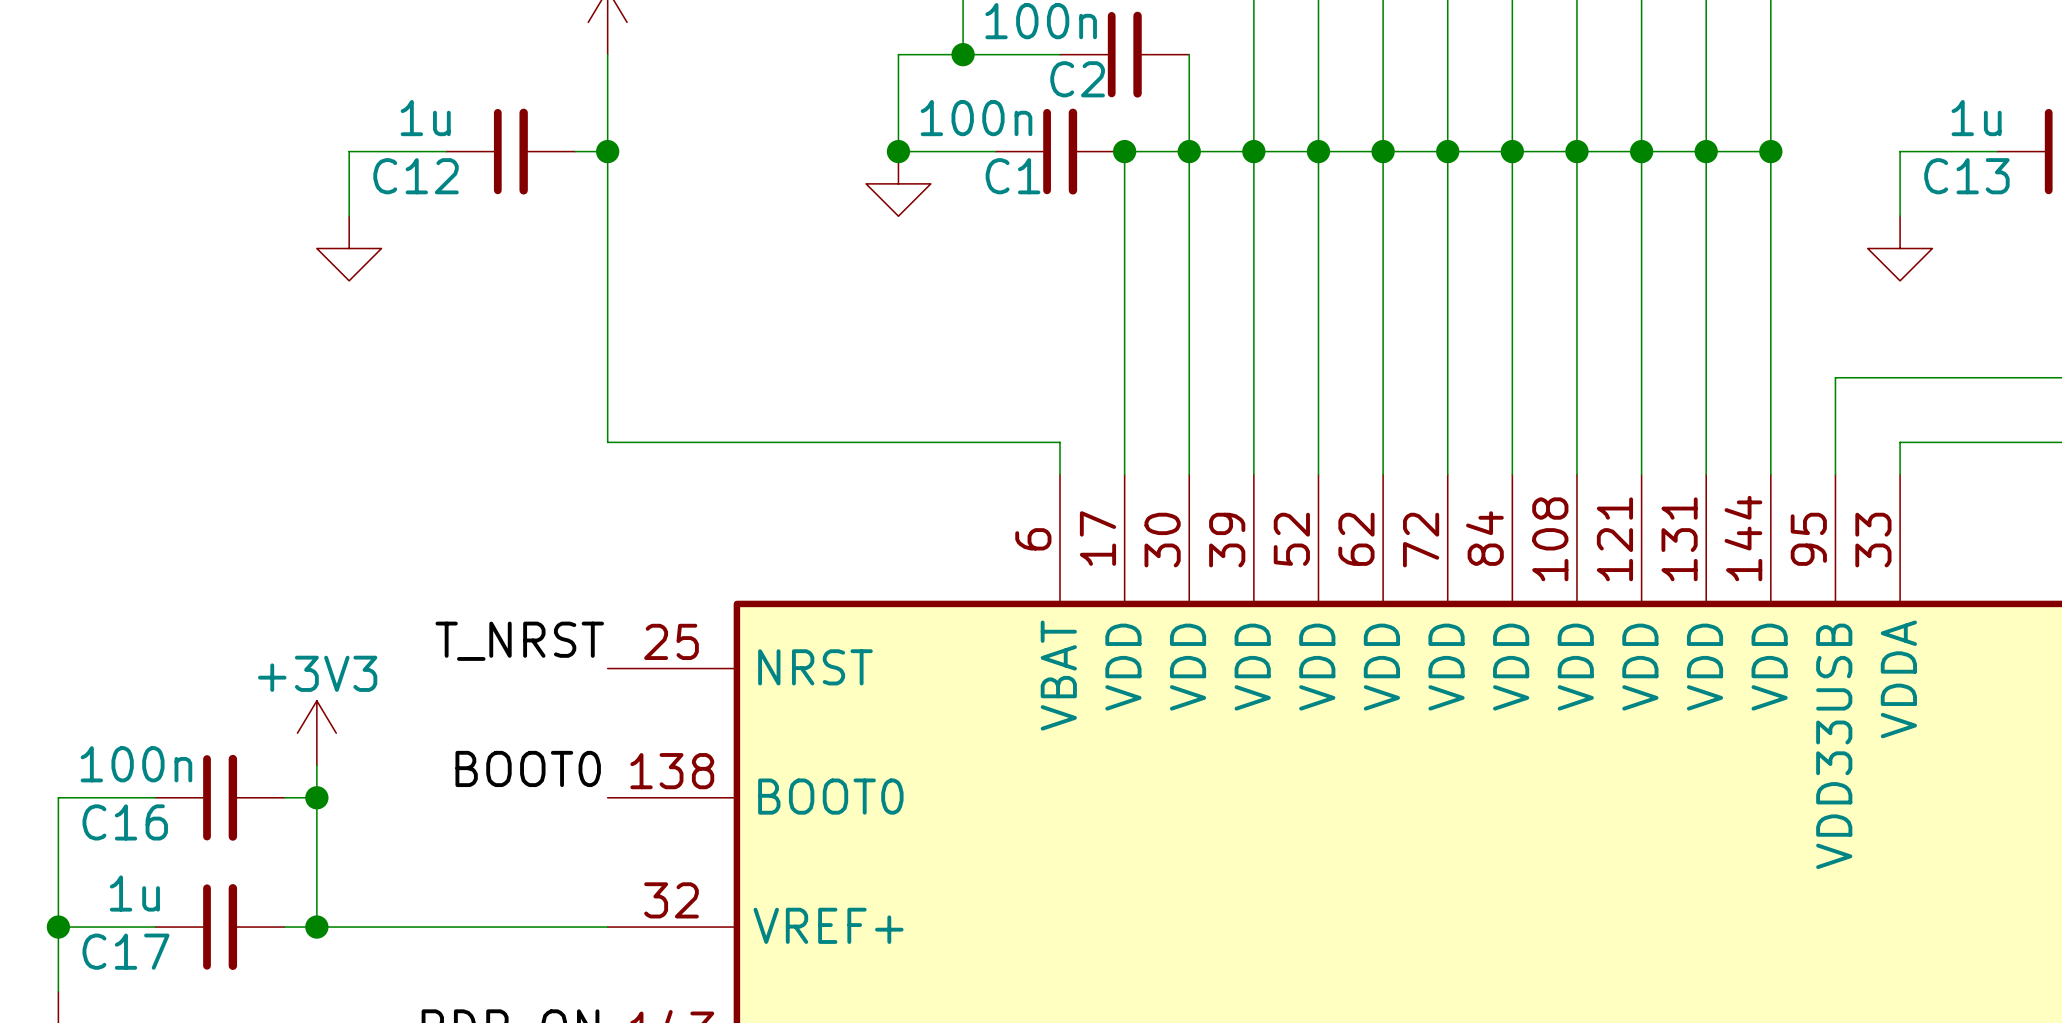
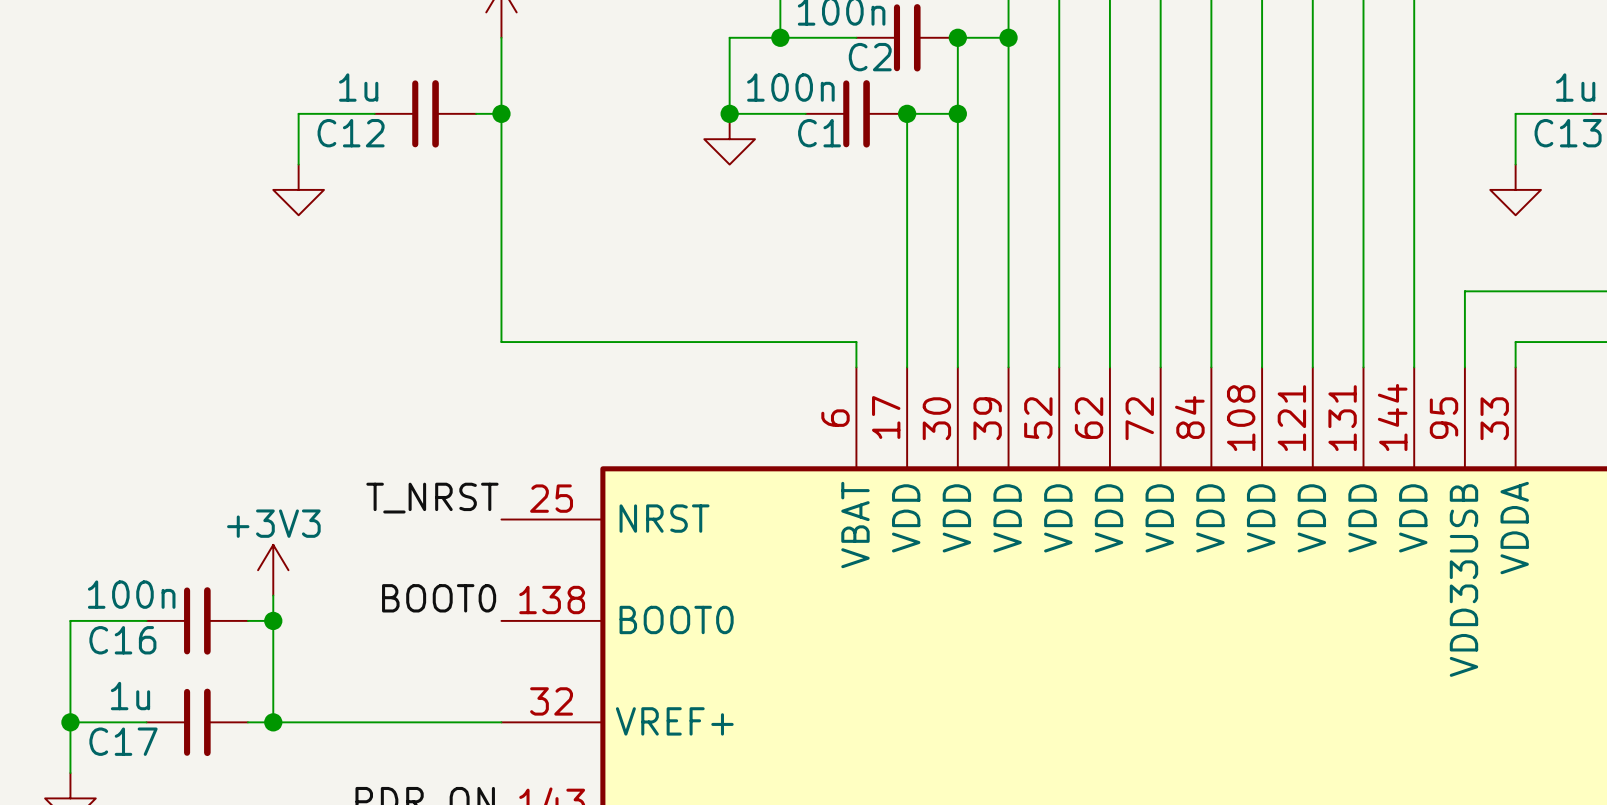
wire: none -> (957, 37) (1008, 37)
junction: none -> (957, 37)
junction: none -> (1008, 37)
wire: (1189, 151) (1770, 151) -> none
junction: (1253, 151) -> none
junction: (1318, 151) -> none
junction: (1383, 151) -> none
junction: (1447, 151) -> none
junction: (1512, 151) -> none
junction: (1576, 151) -> none
junction: (1641, 151) -> none
junction: (1706, 151) -> none
junction: (1770, 151) -> none

